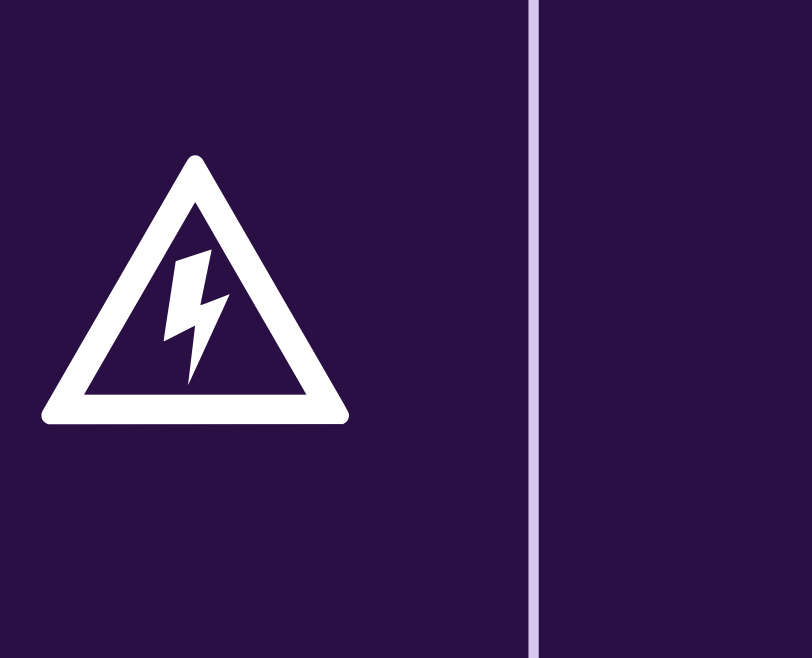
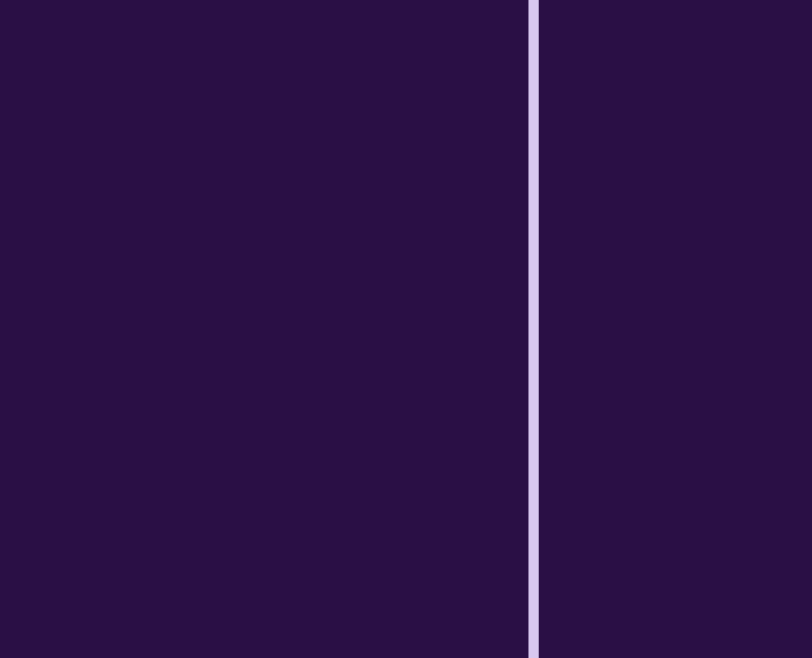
drawing: [41, 155, 349, 425] -> none

